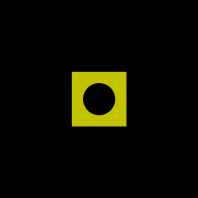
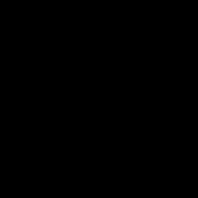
part: (99, 99) -> none

